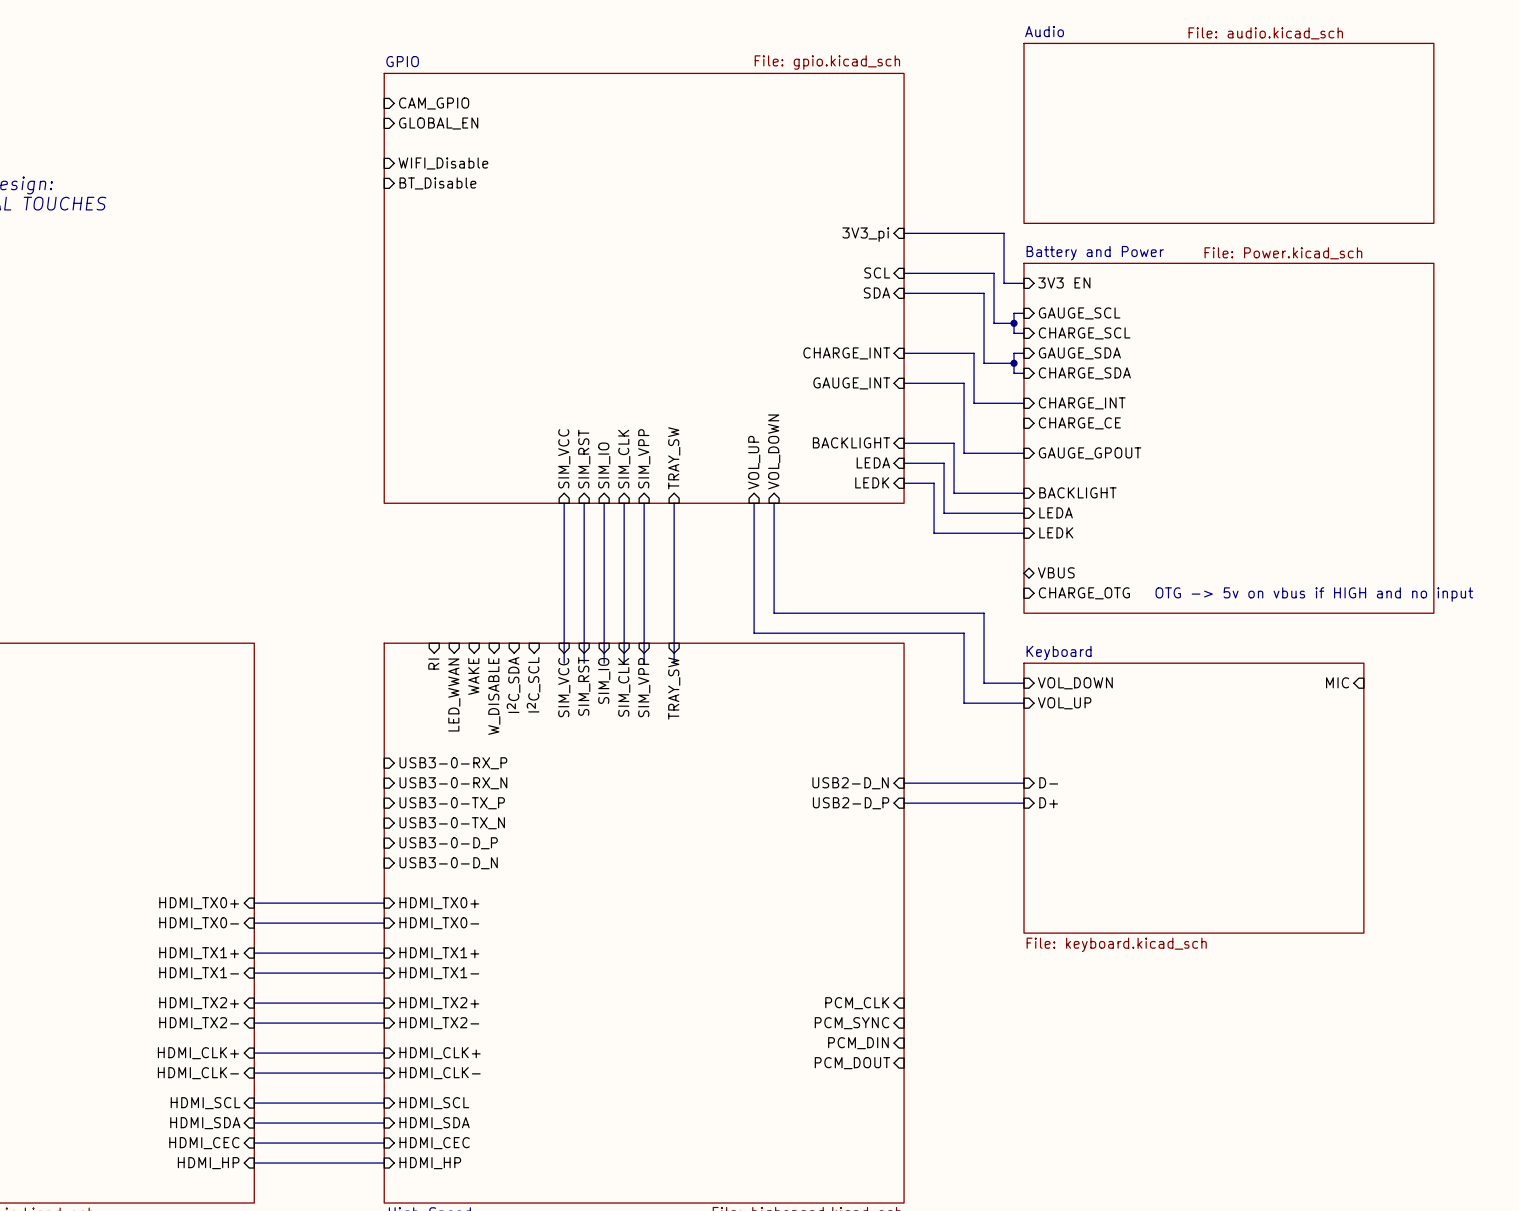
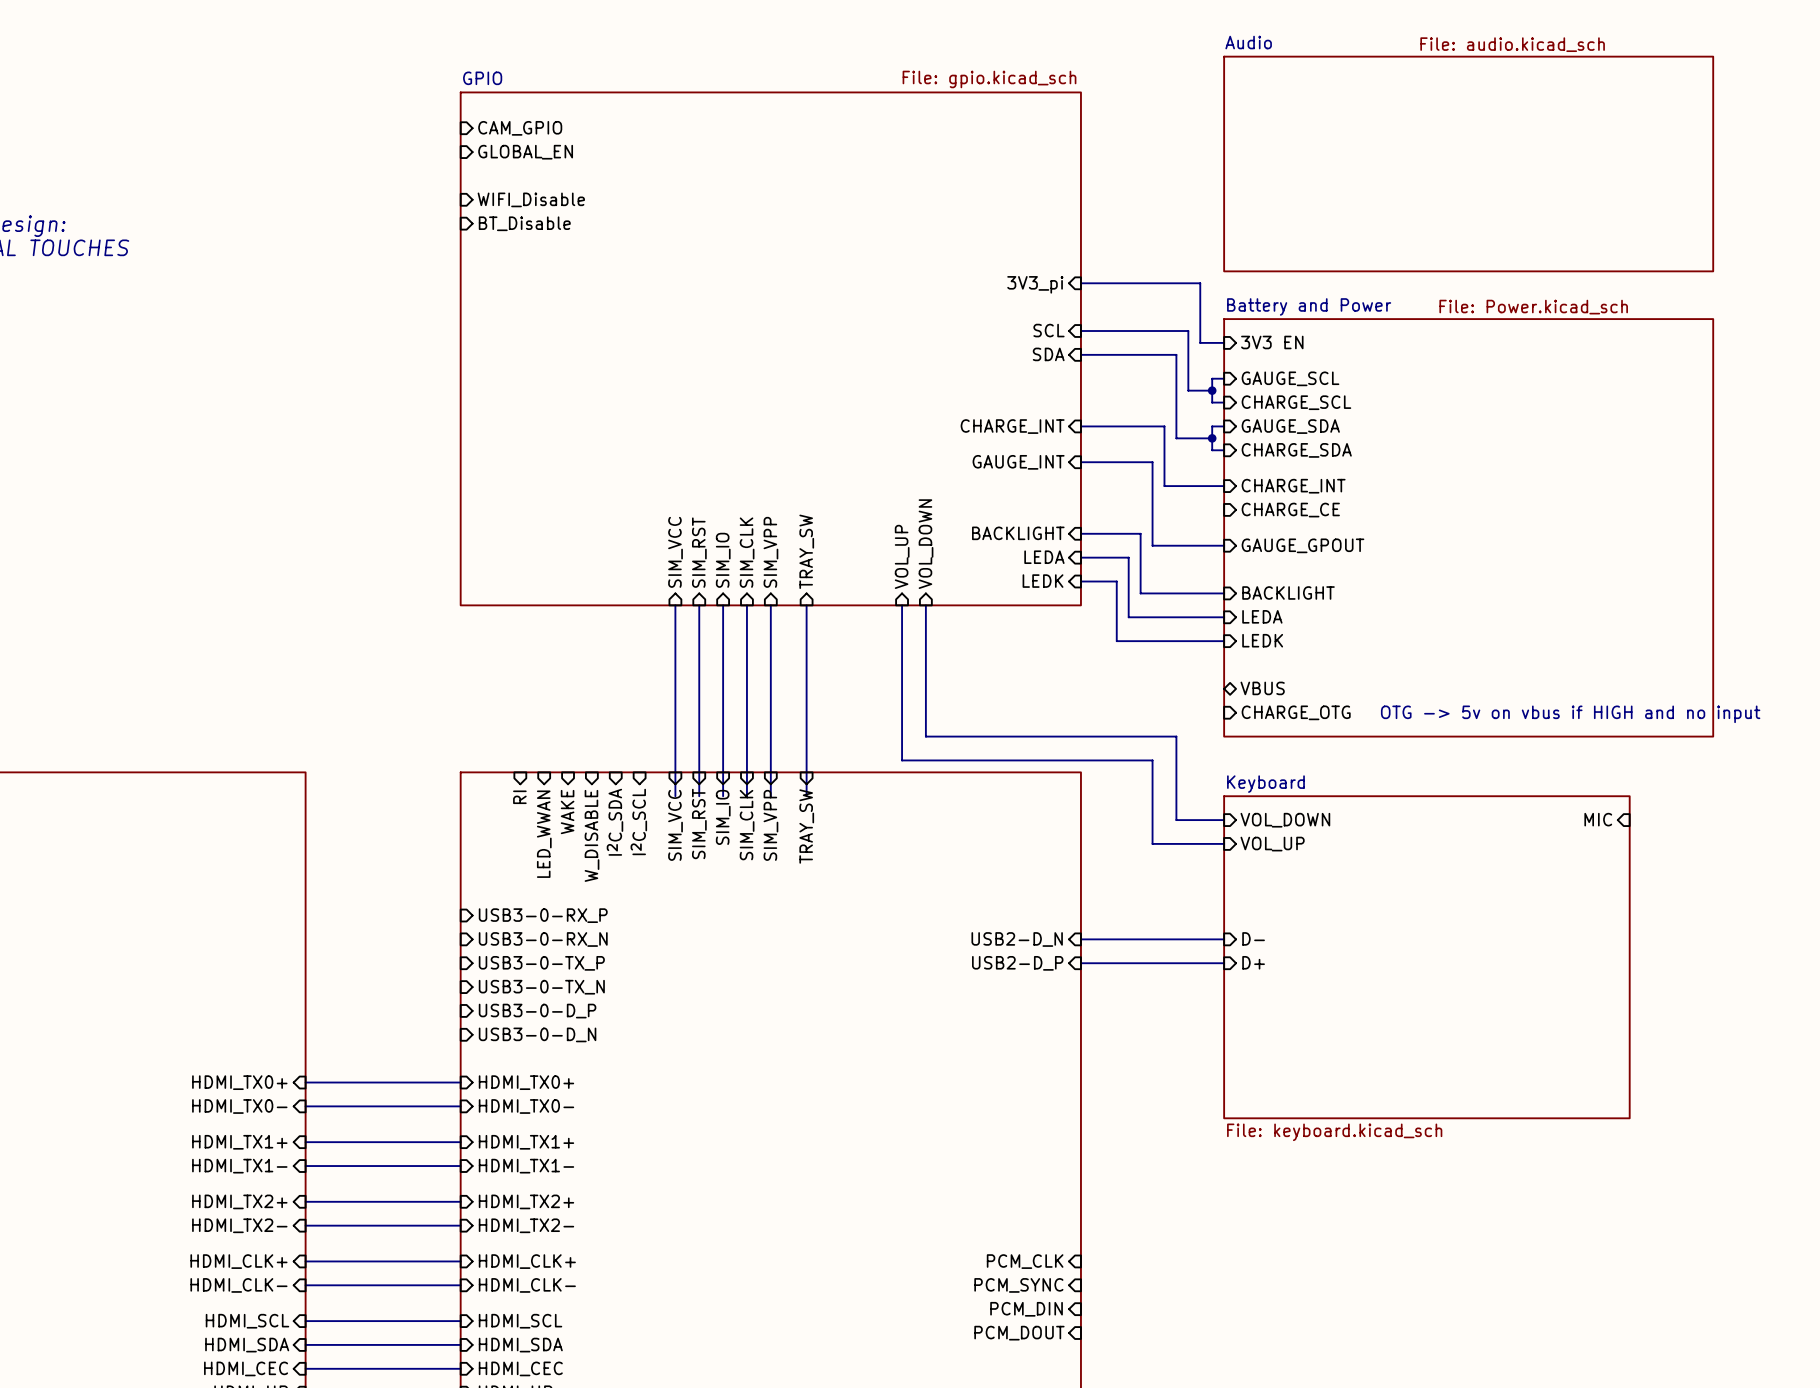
sheet pin position: PCM_CLK (857, 1003) -> PCM_CLK (1025, 1261)
sheet pin position: PCM_SYNC (852, 1023) -> PCM_SYNC (1018, 1285)
sheet pin position: PCM_DIN (858, 1043) -> PCM_DIN (1026, 1309)
sheet pin position: PCM_DOUT (852, 1063) -> PCM_DOUT (1019, 1333)

